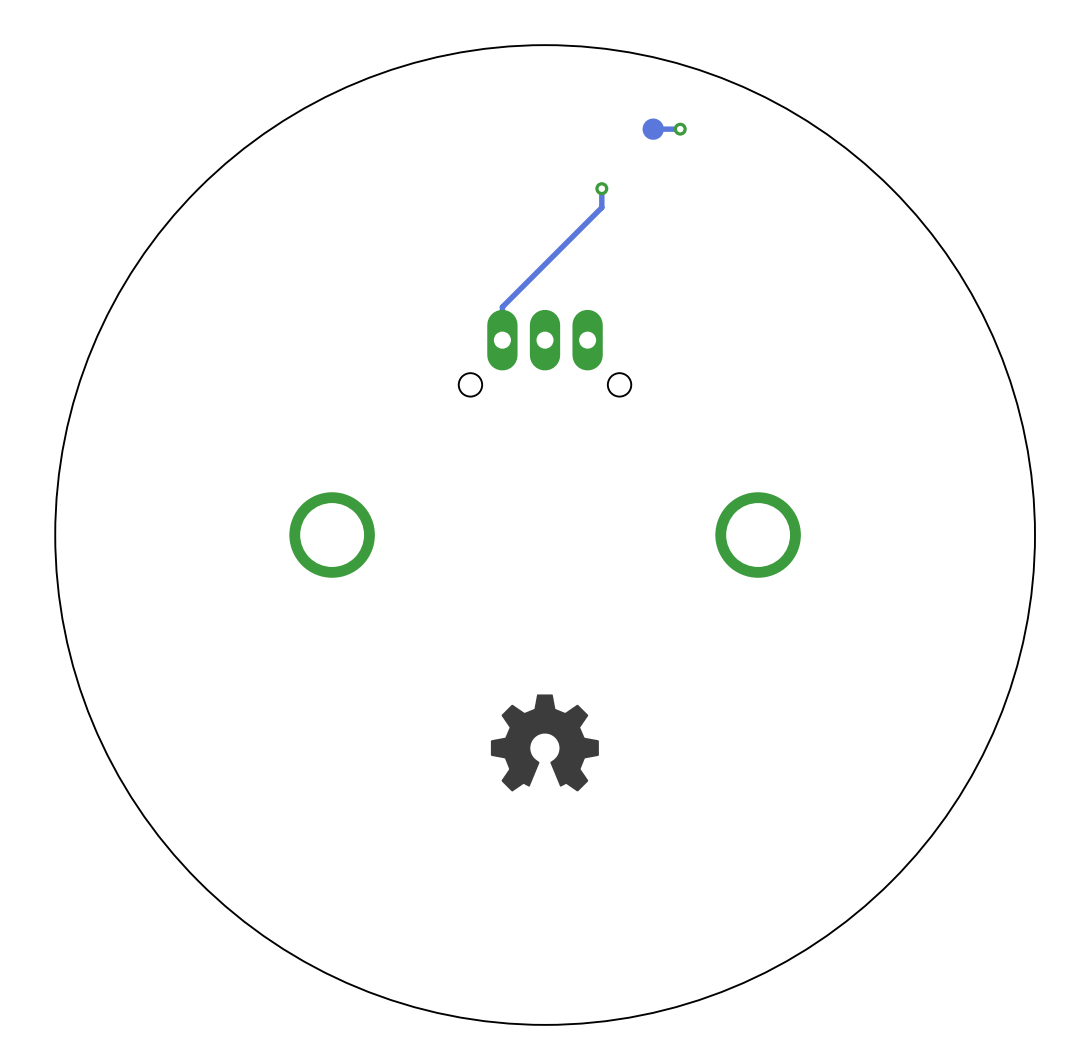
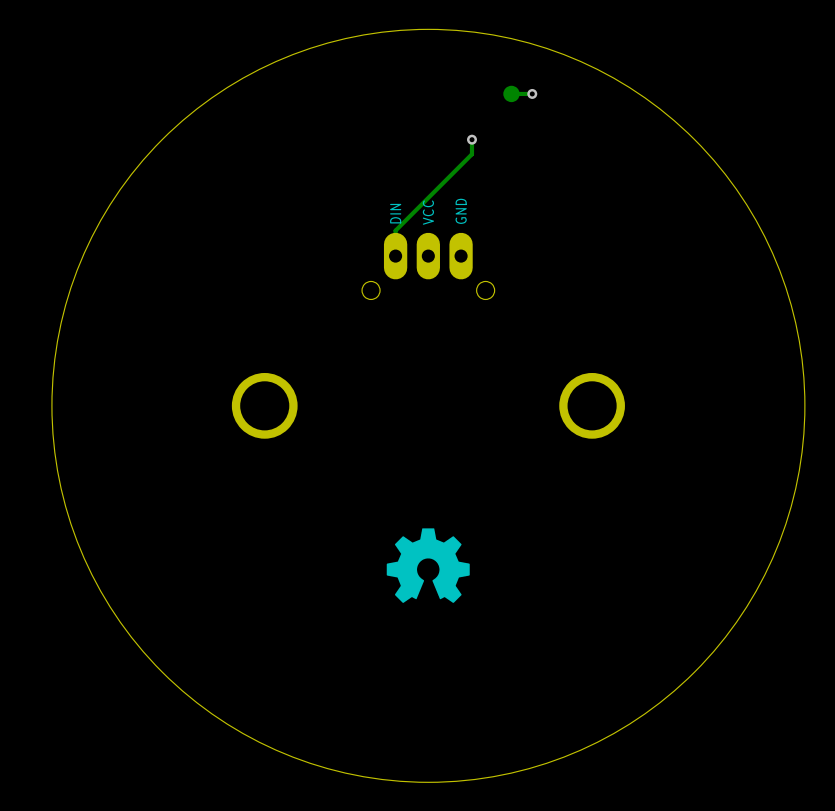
text: none -> GND (461, 211)
text: none -> VCC (428, 212)
text: none -> DIN (395, 213)

